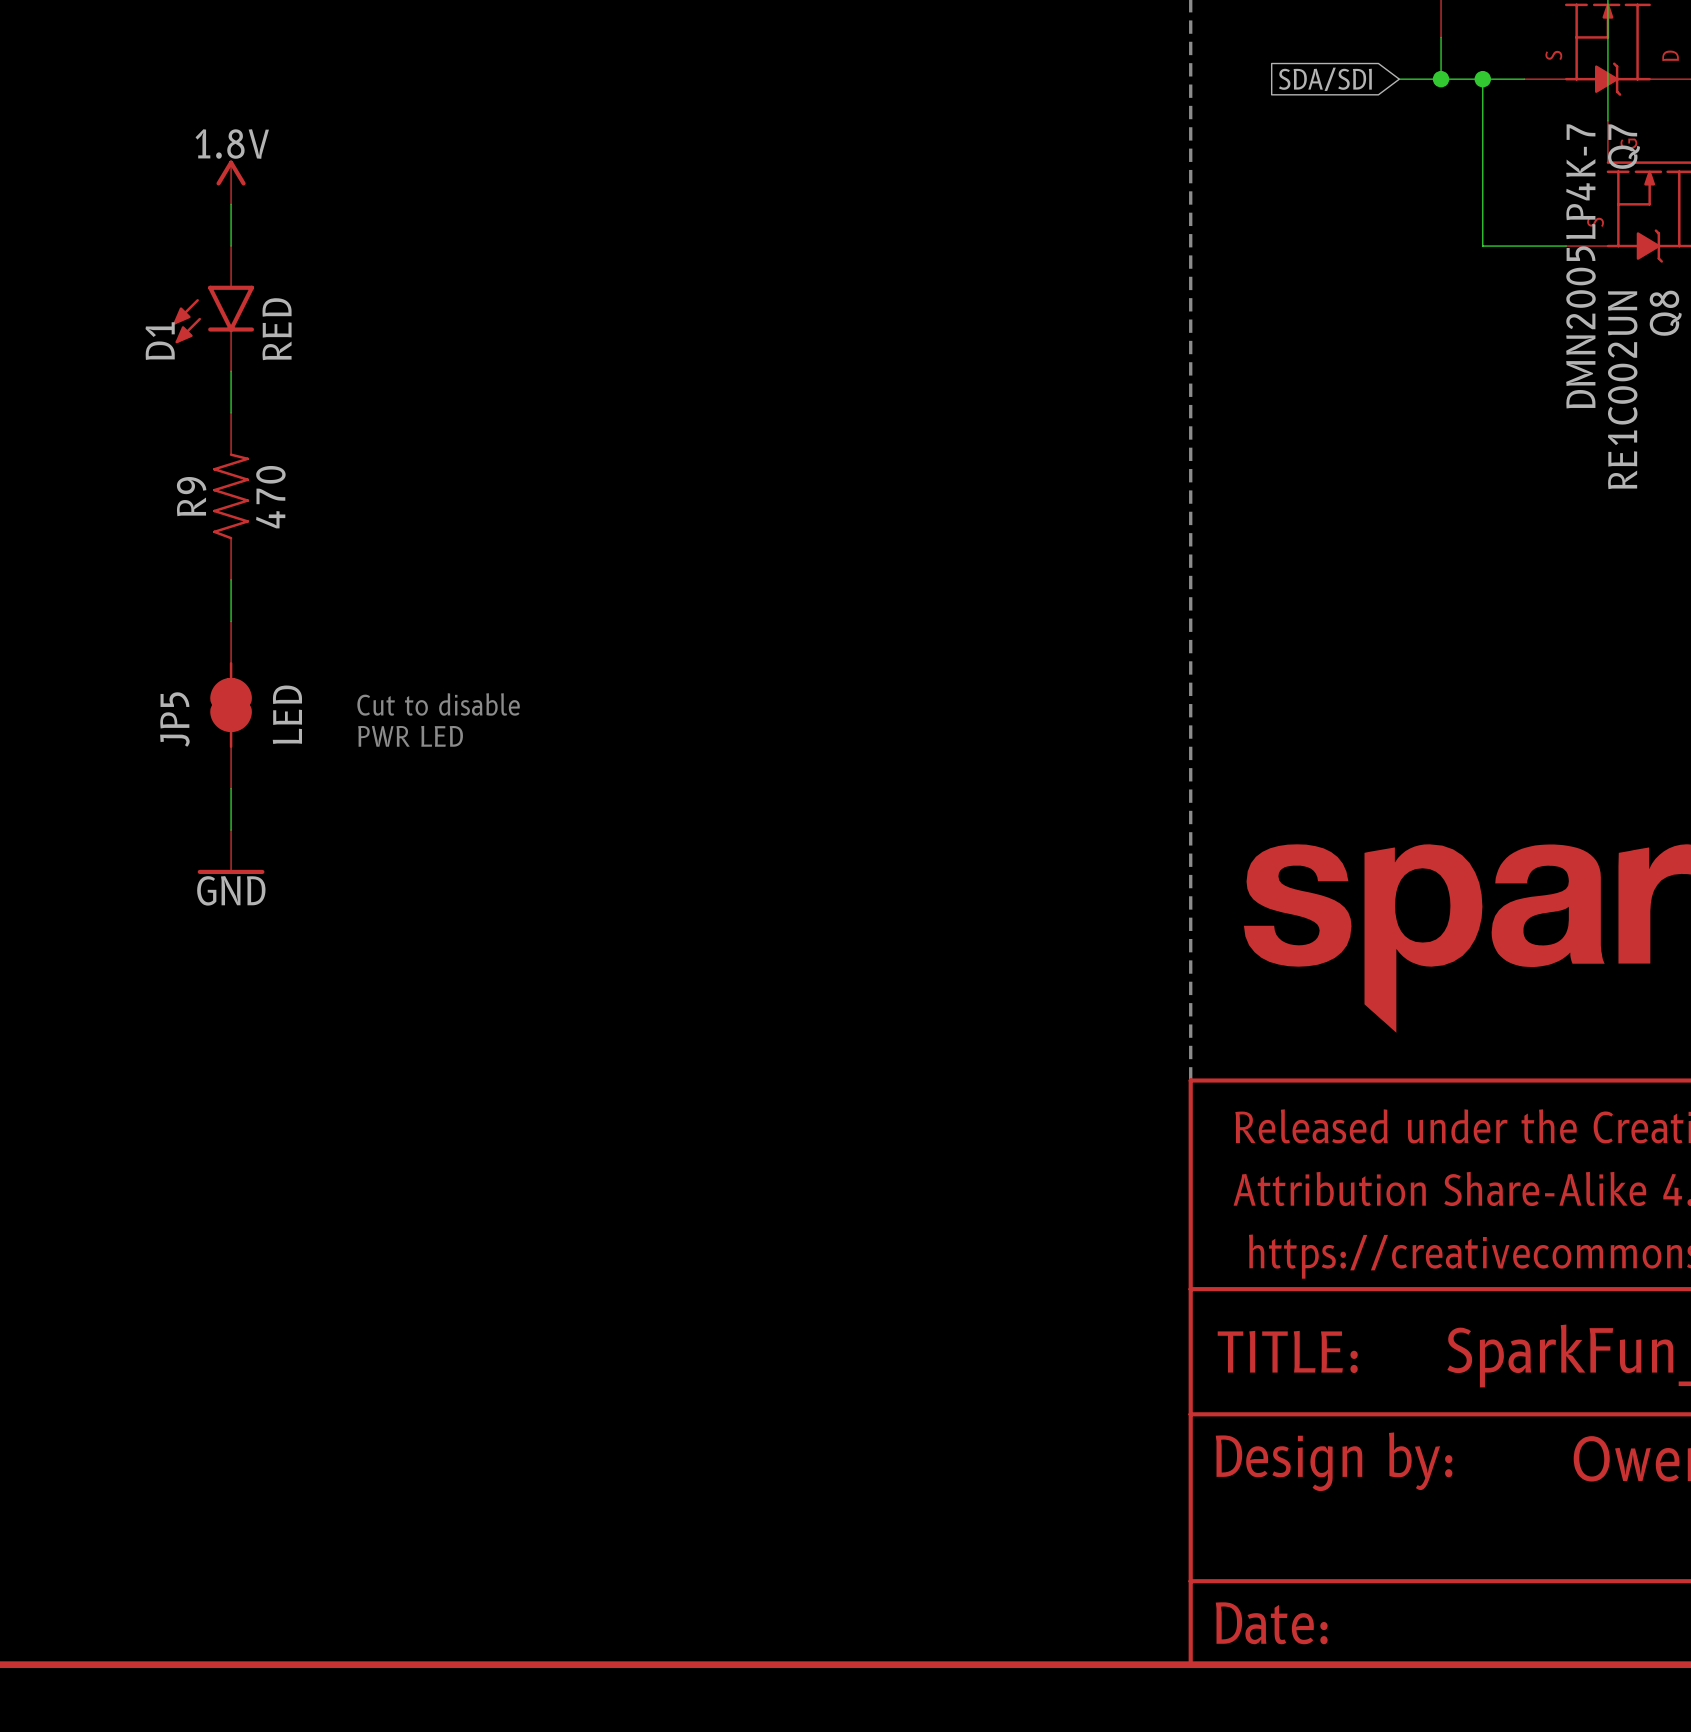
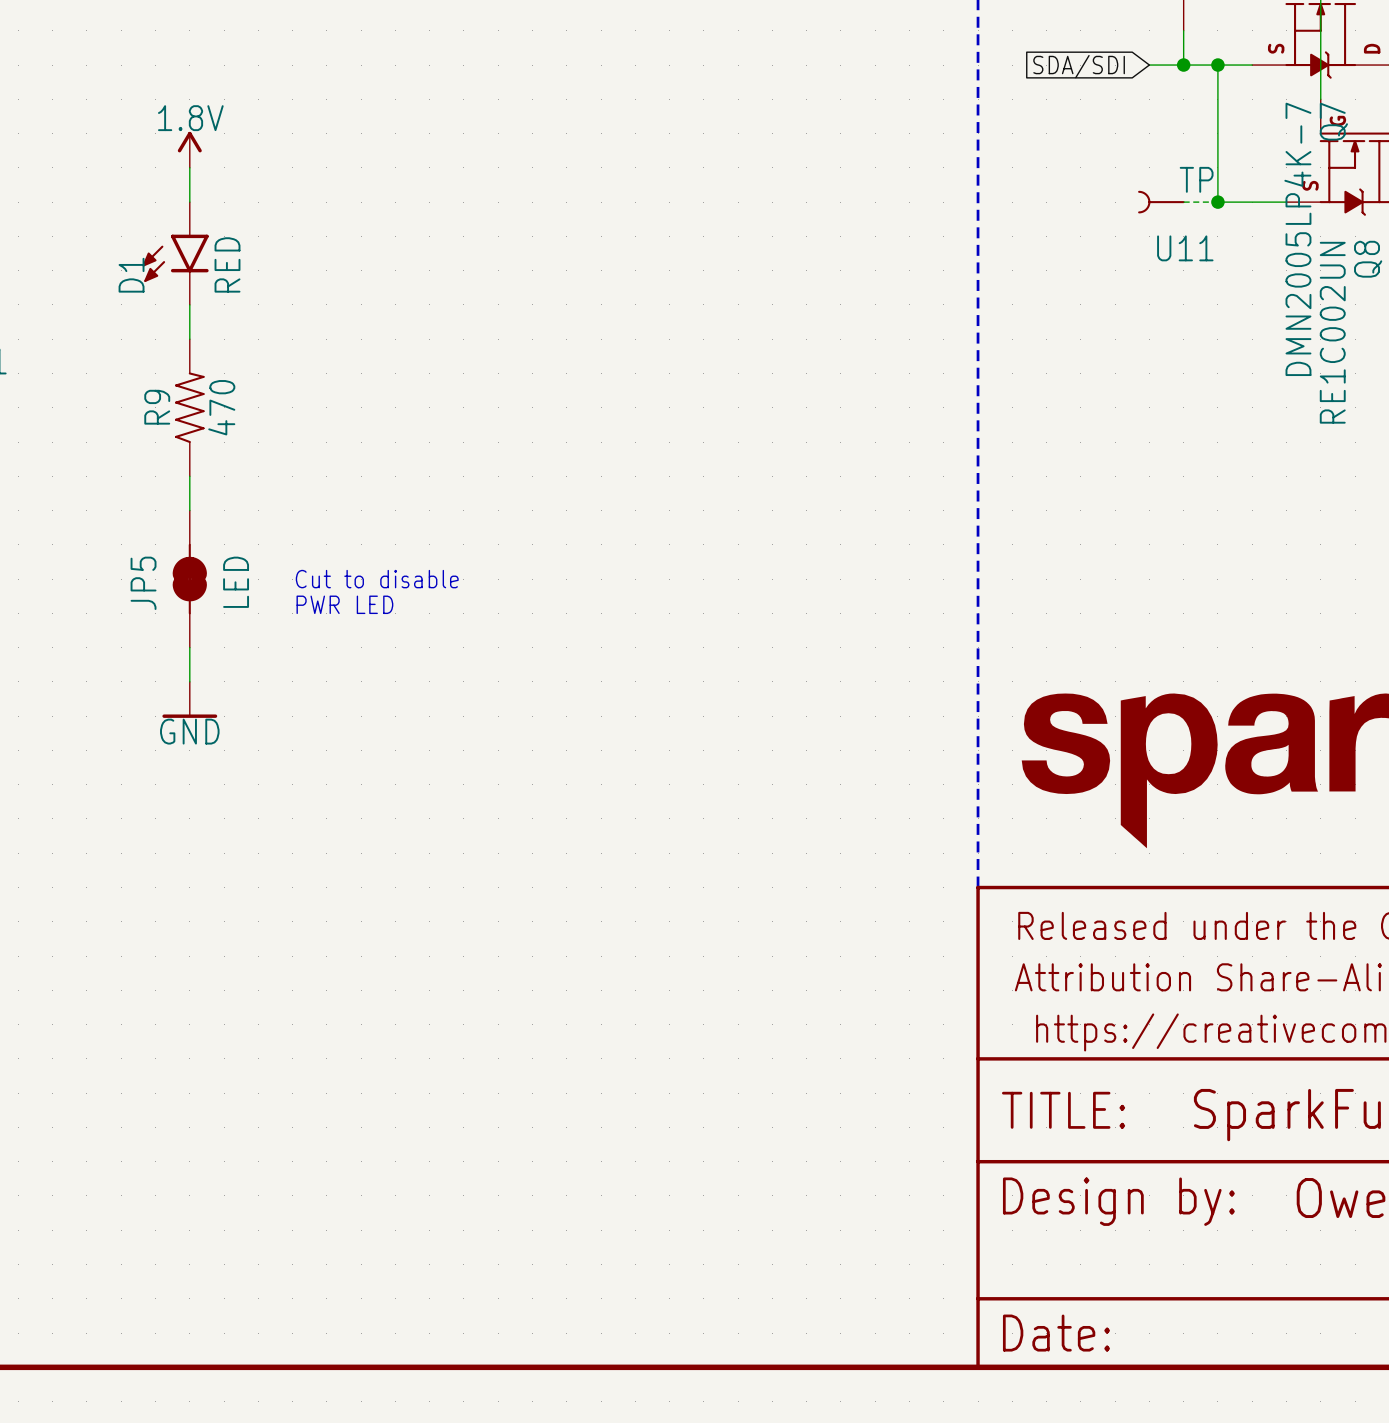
U11: none -> TP (1161, 202)
wire: none -> (1183, 202) (1217, 202)
junction: none -> (1217, 202)

